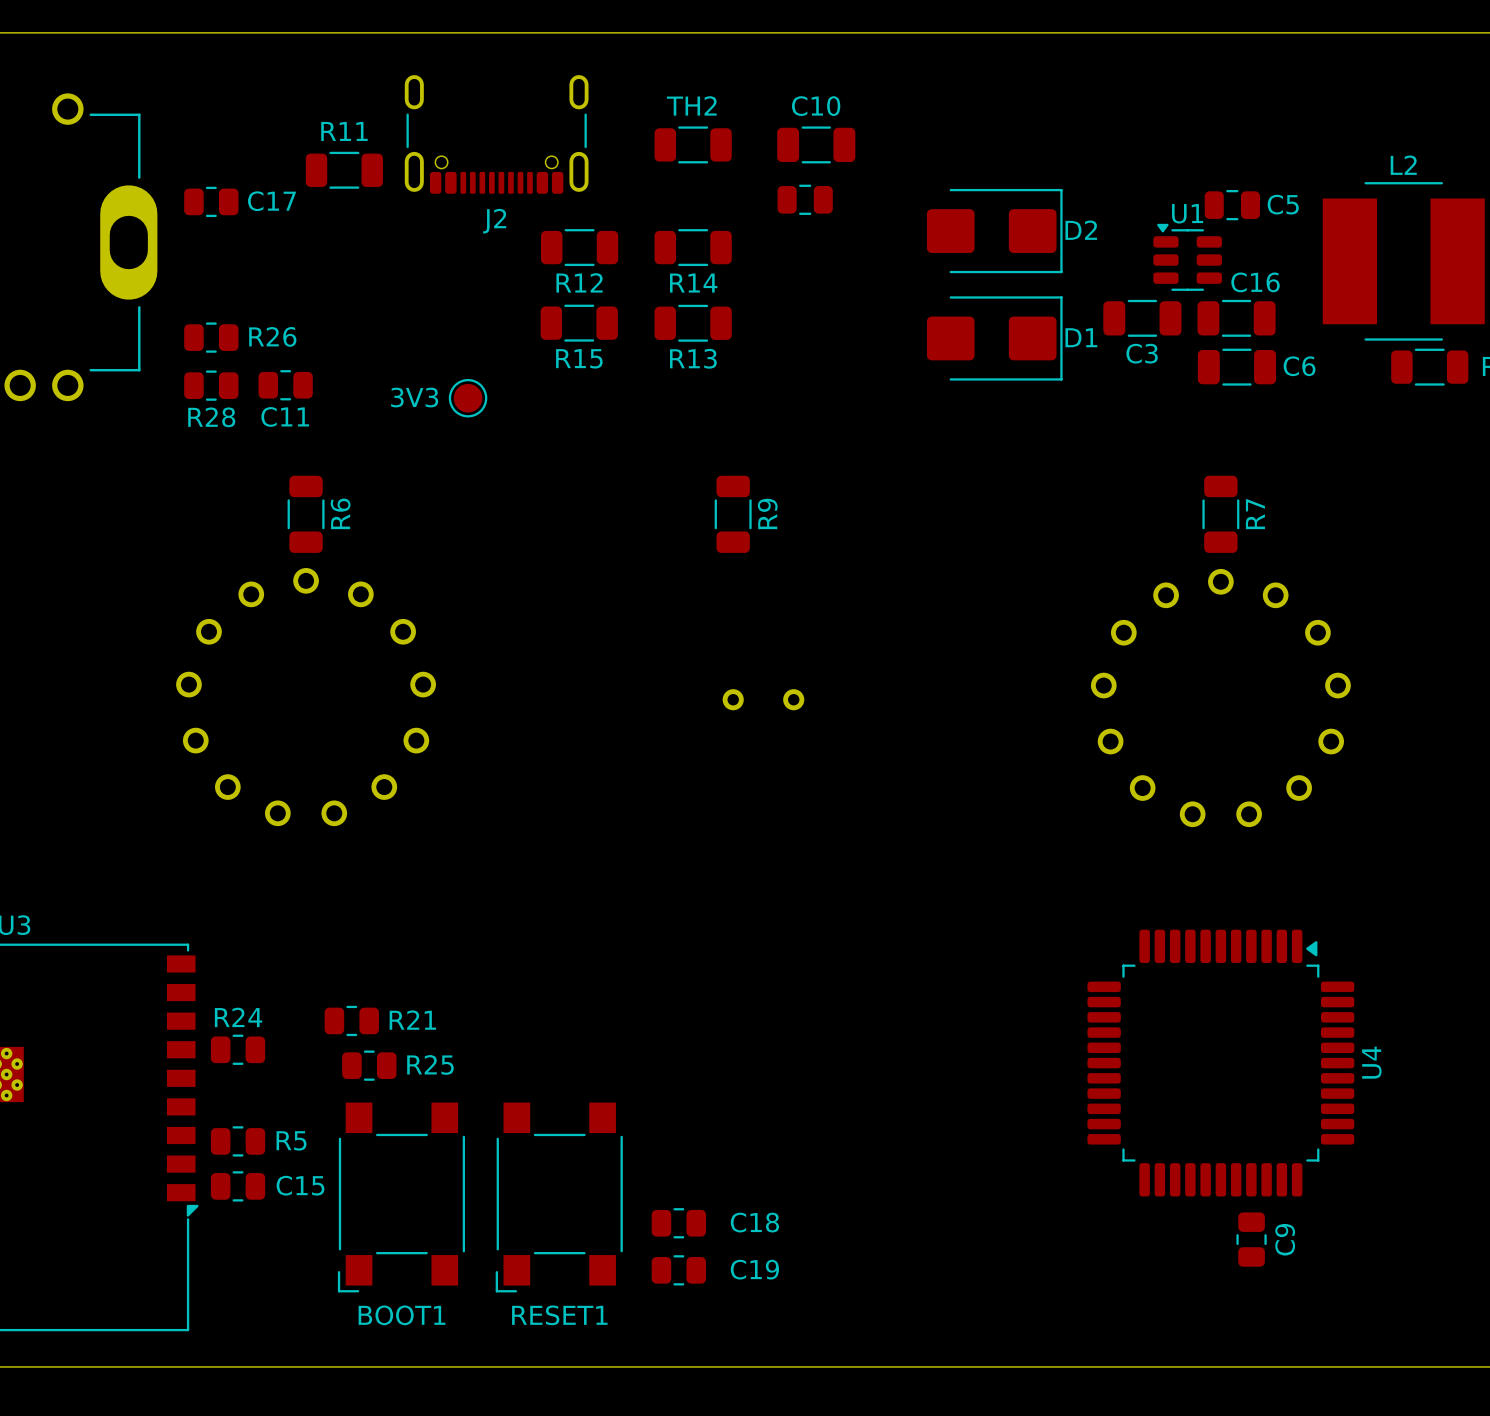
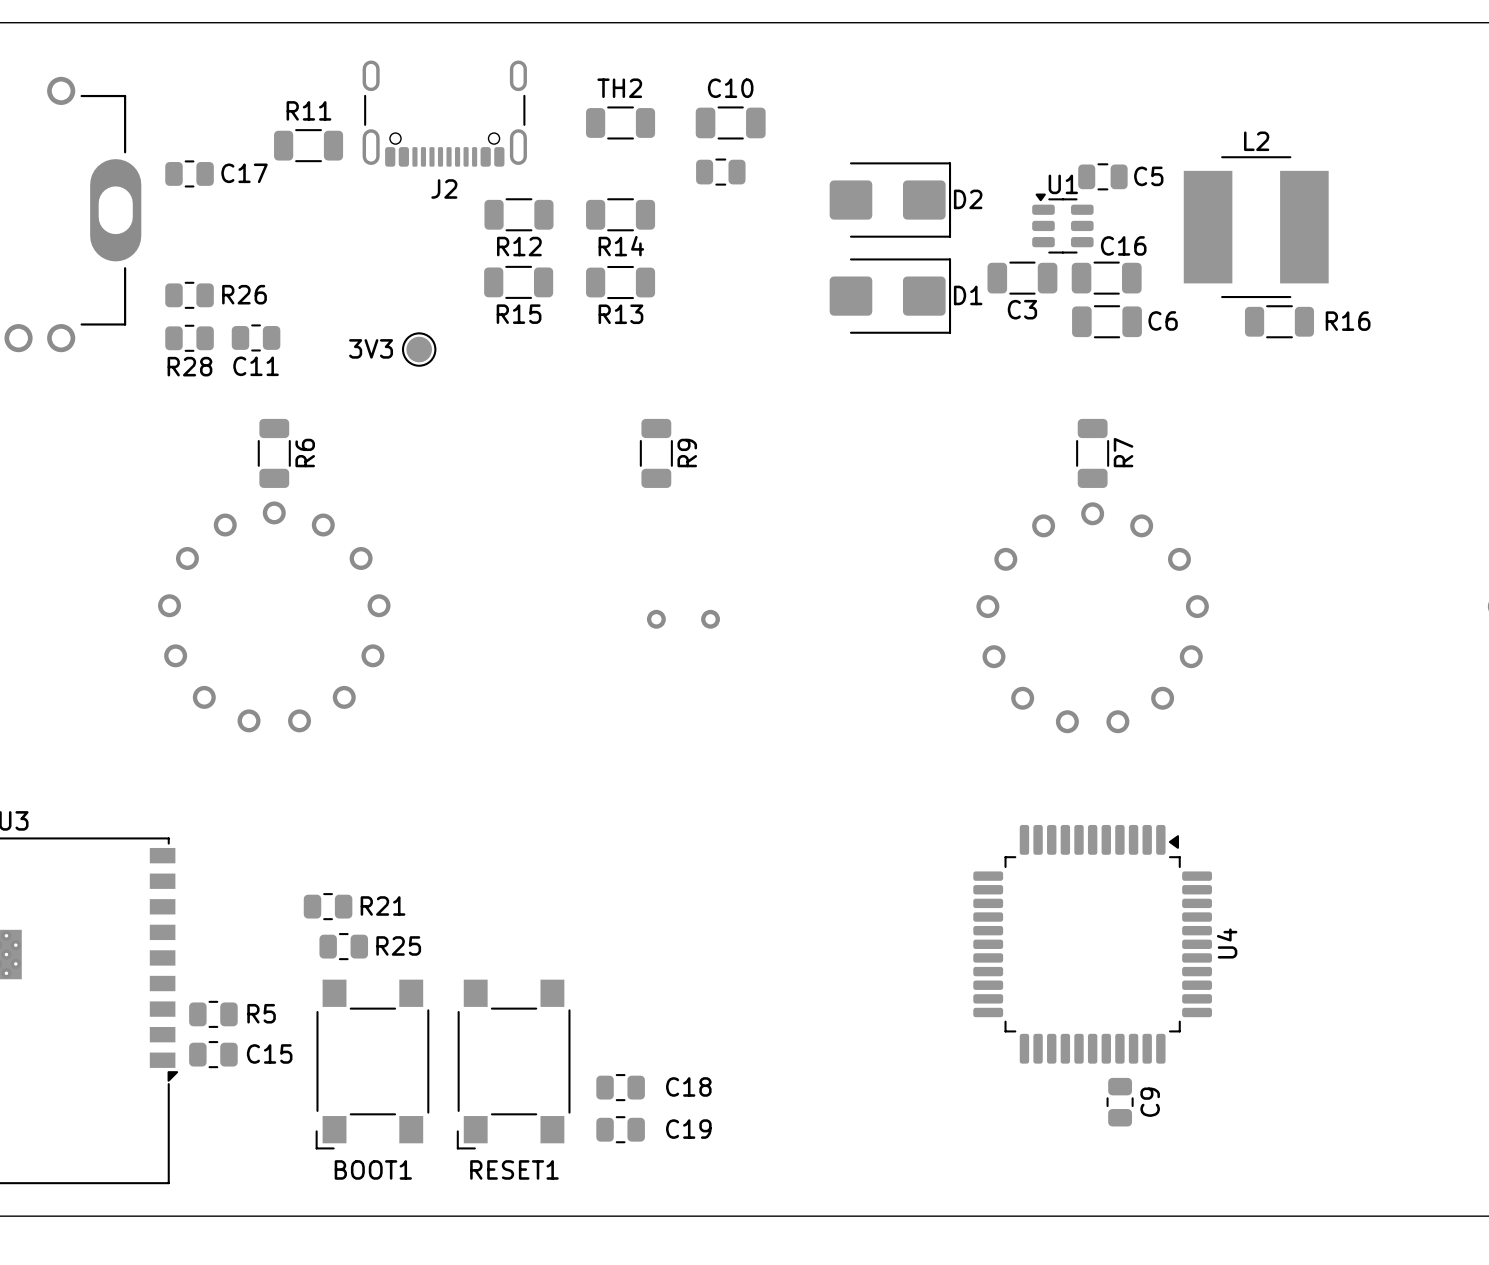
R21 position: (351, 1020) -> (328, 906)
R24: (238, 1049) -> none
R25 position: (369, 1065) -> (343, 946)
BOOT1 position: (401, 1197) -> (372, 1064)
RESET1 position: (559, 1197) -> (513, 1064)
C18 position: (678, 1223) -> (620, 1087)
C19 position: (678, 1270) -> (620, 1129)

